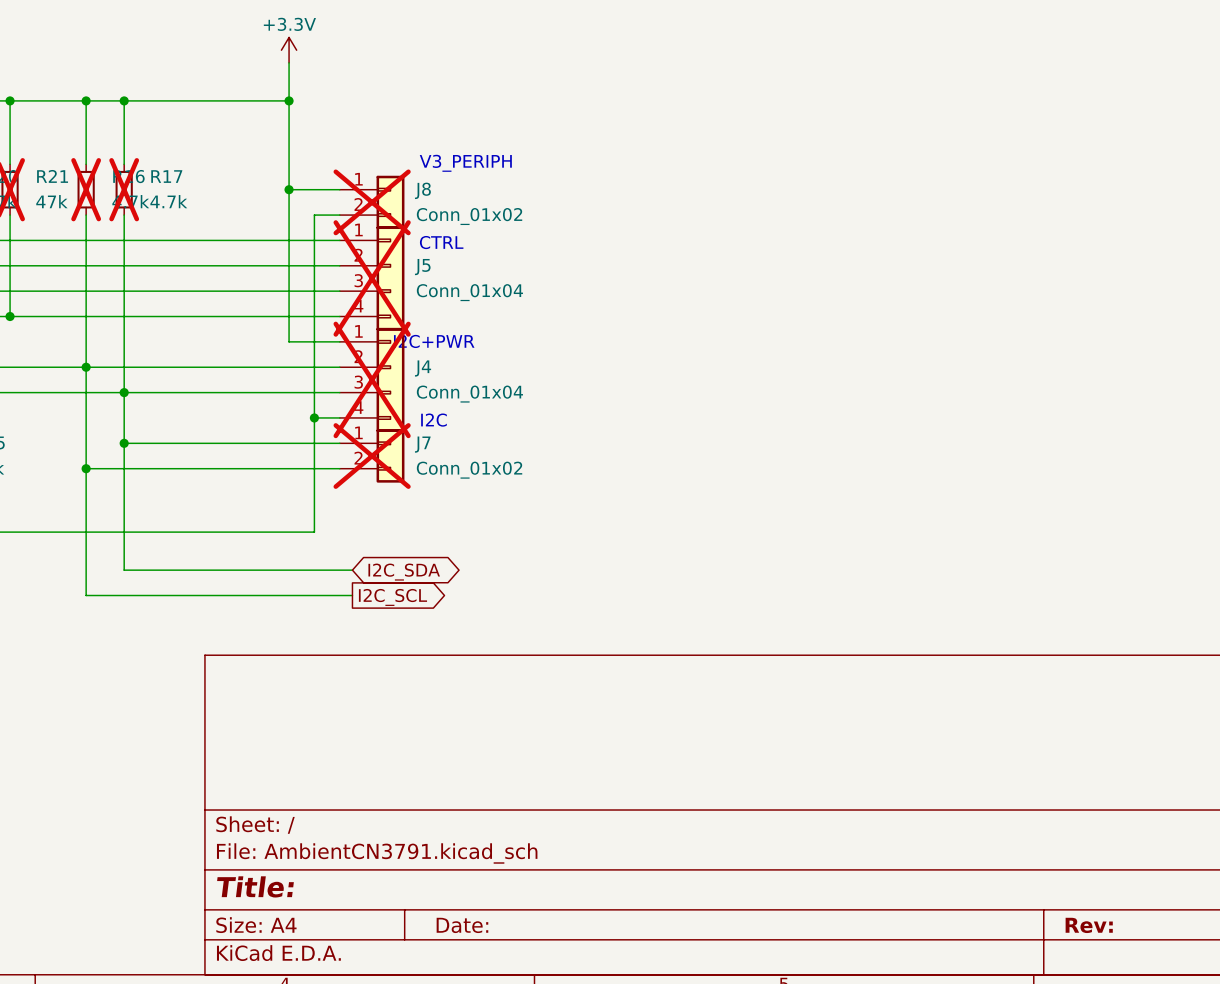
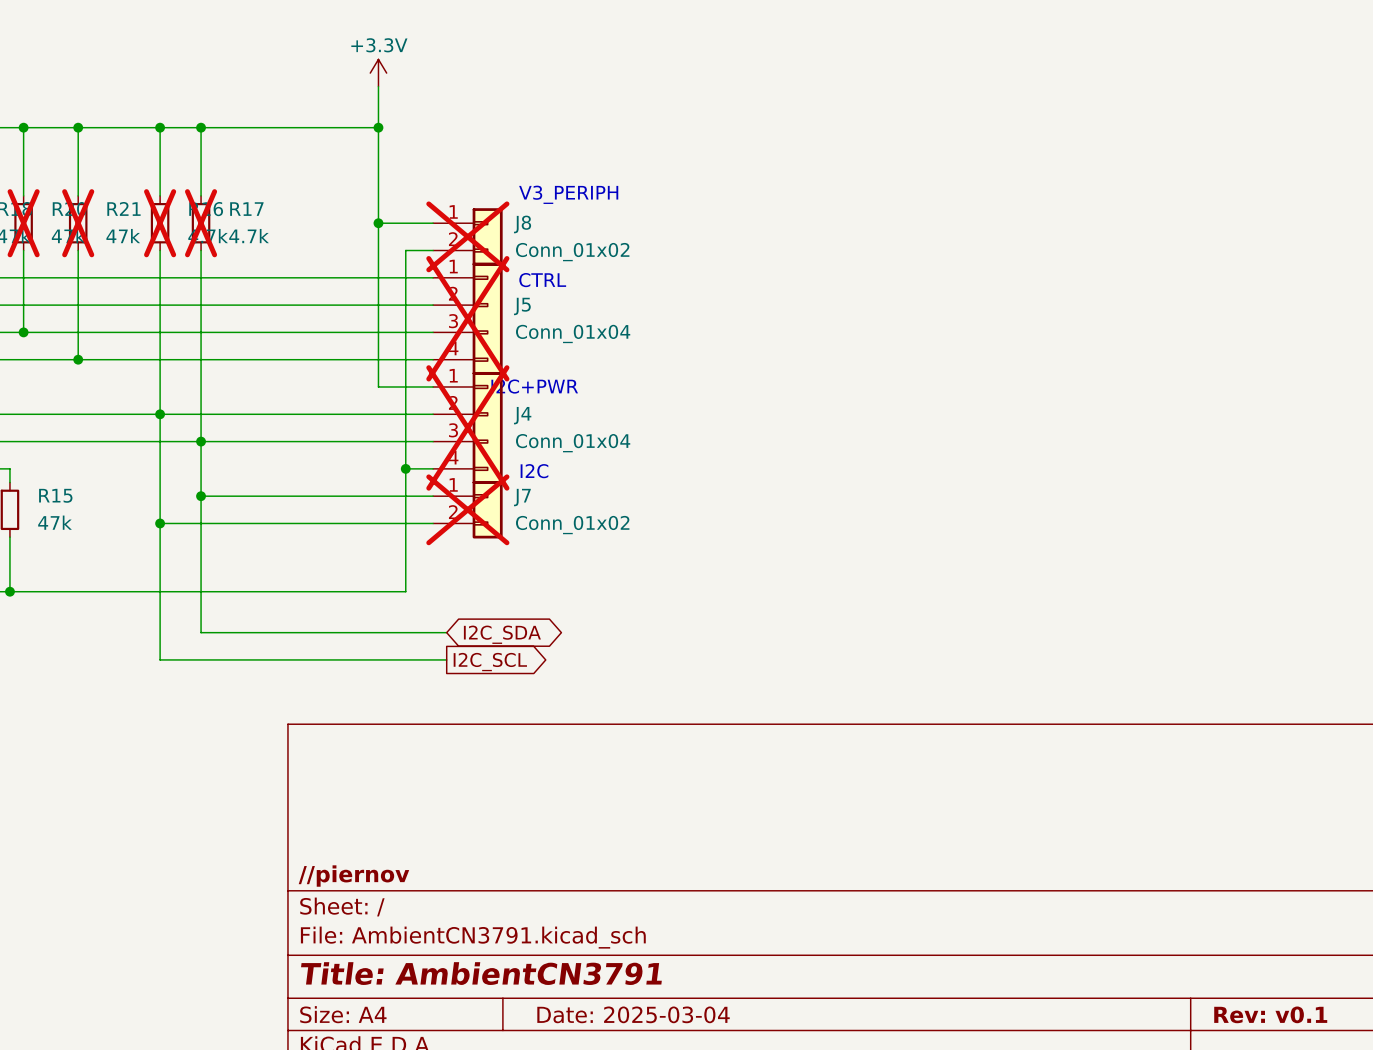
title block: none -> //piernov (353, 876)
title block: Title: (255, 886) -> Title: AmbientCN3791 (481, 973)
title block: Date: (462, 925) -> Date: 2025-03-04 (633, 1014)
title block: Rev: (1089, 925) -> Rev: v0.1 (1270, 1014)

